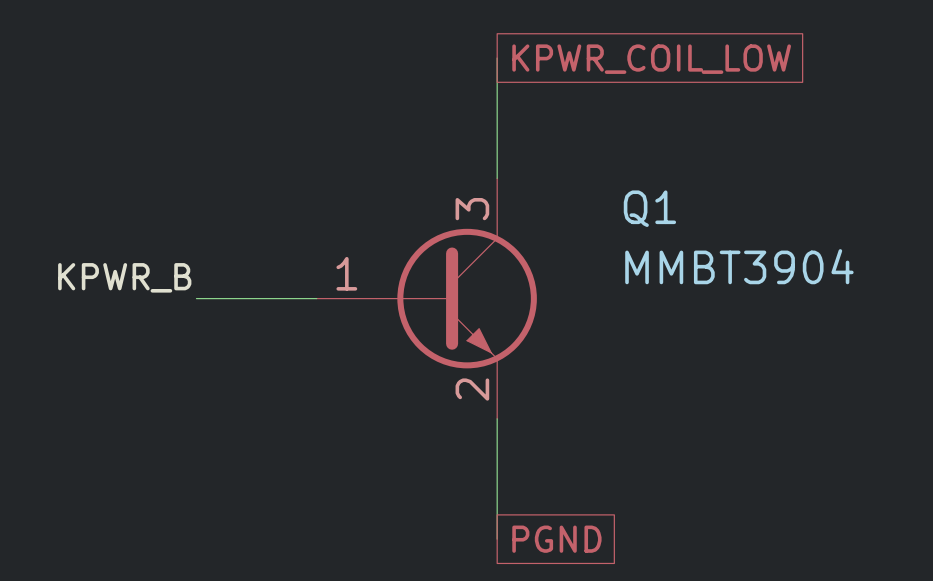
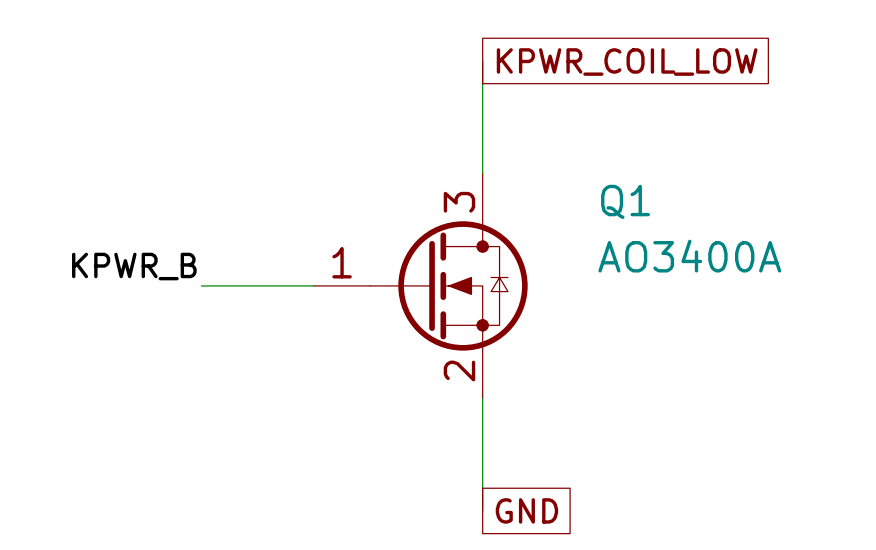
Q1 symbol: [316, 178, 537, 419] -> [313, 173, 528, 399]
Q1 value: MMBT3904 (739, 266) -> AO3400A (689, 256)
global label: PGND (556, 539) -> GND (526, 510)

